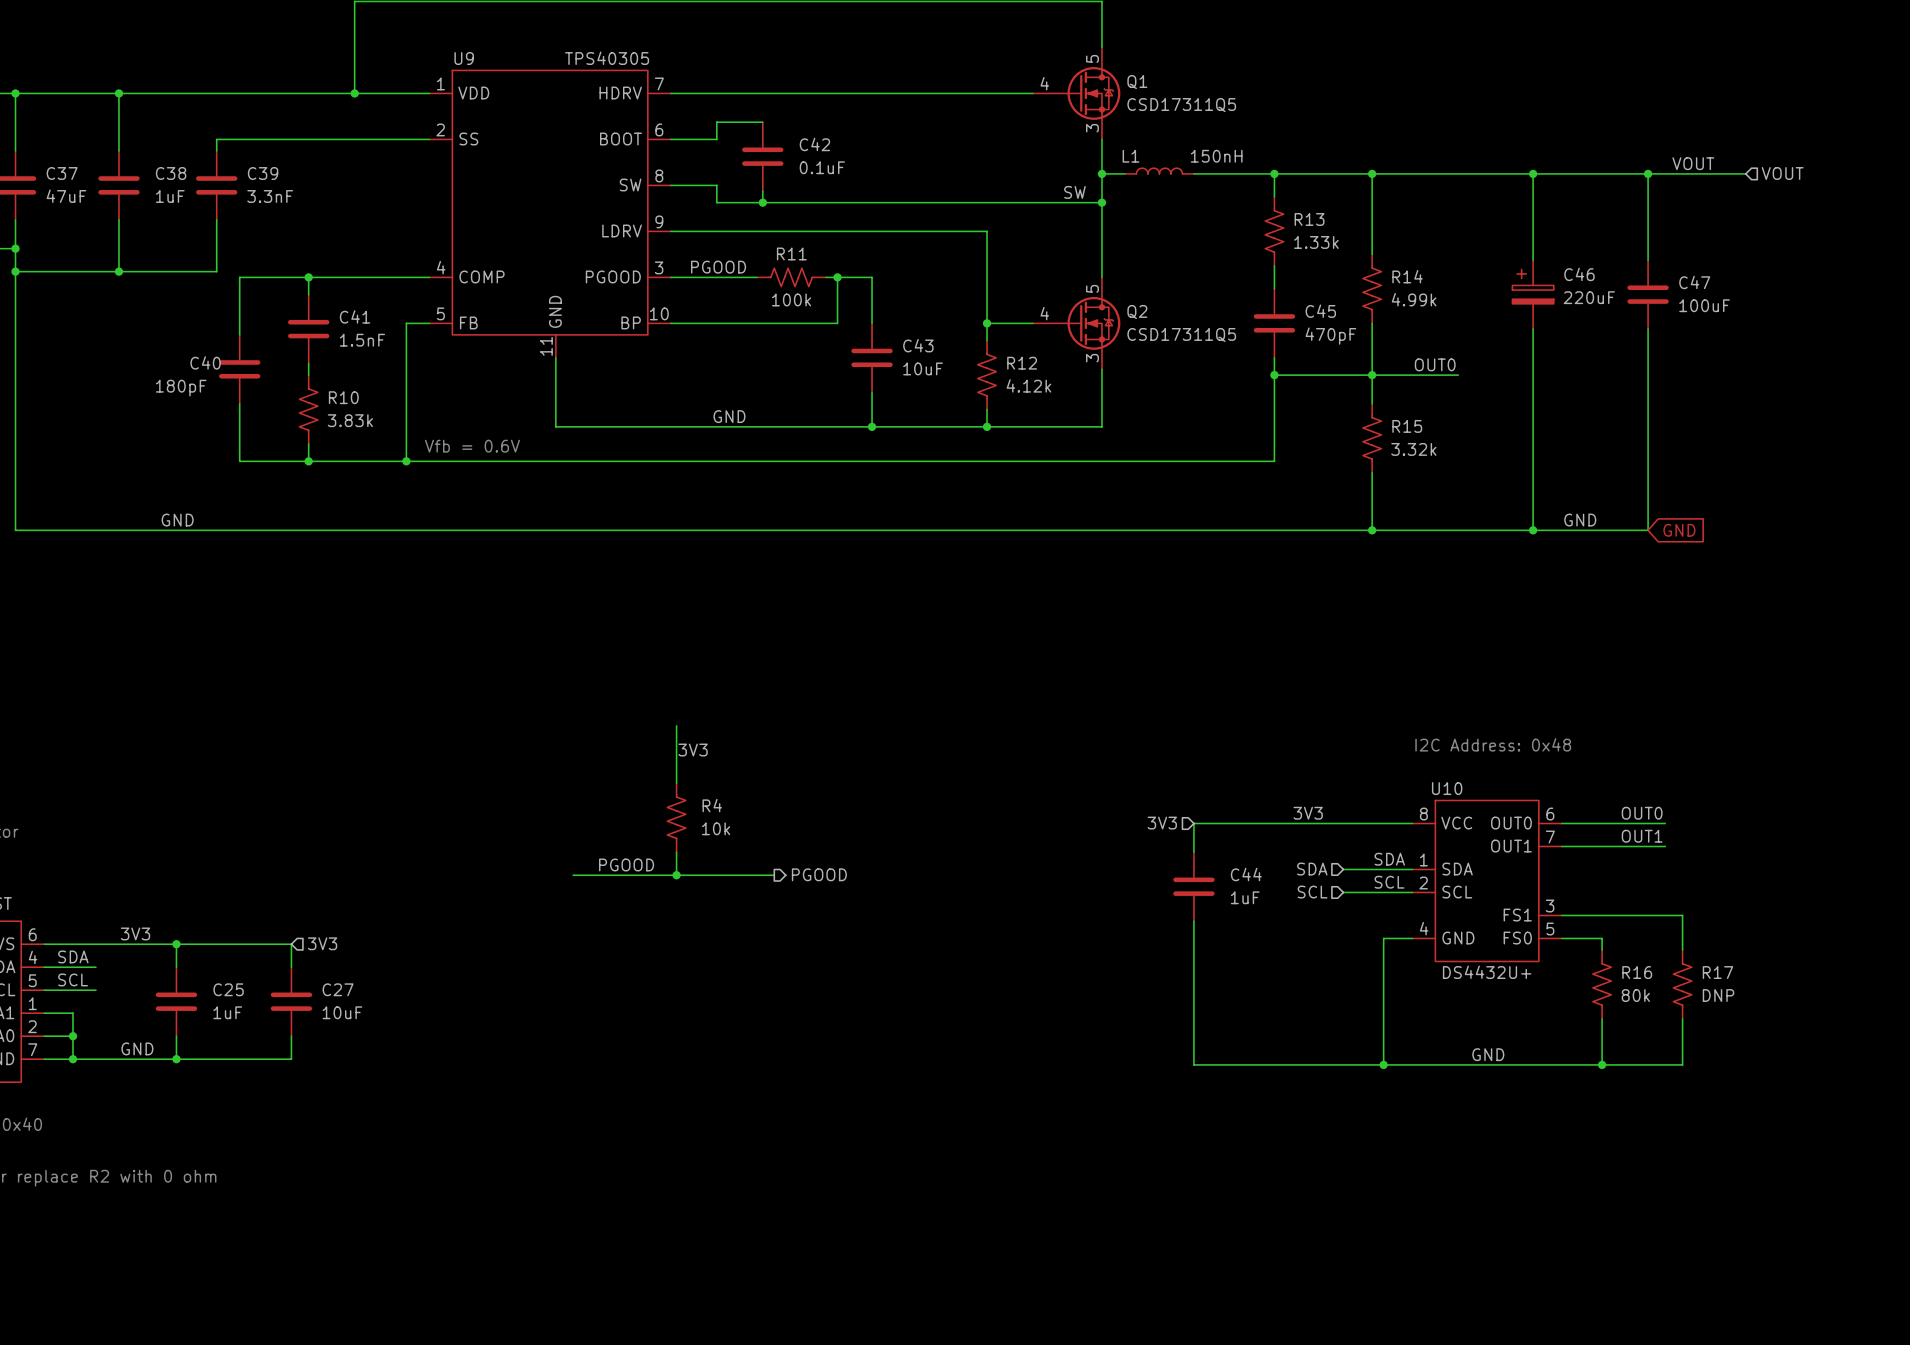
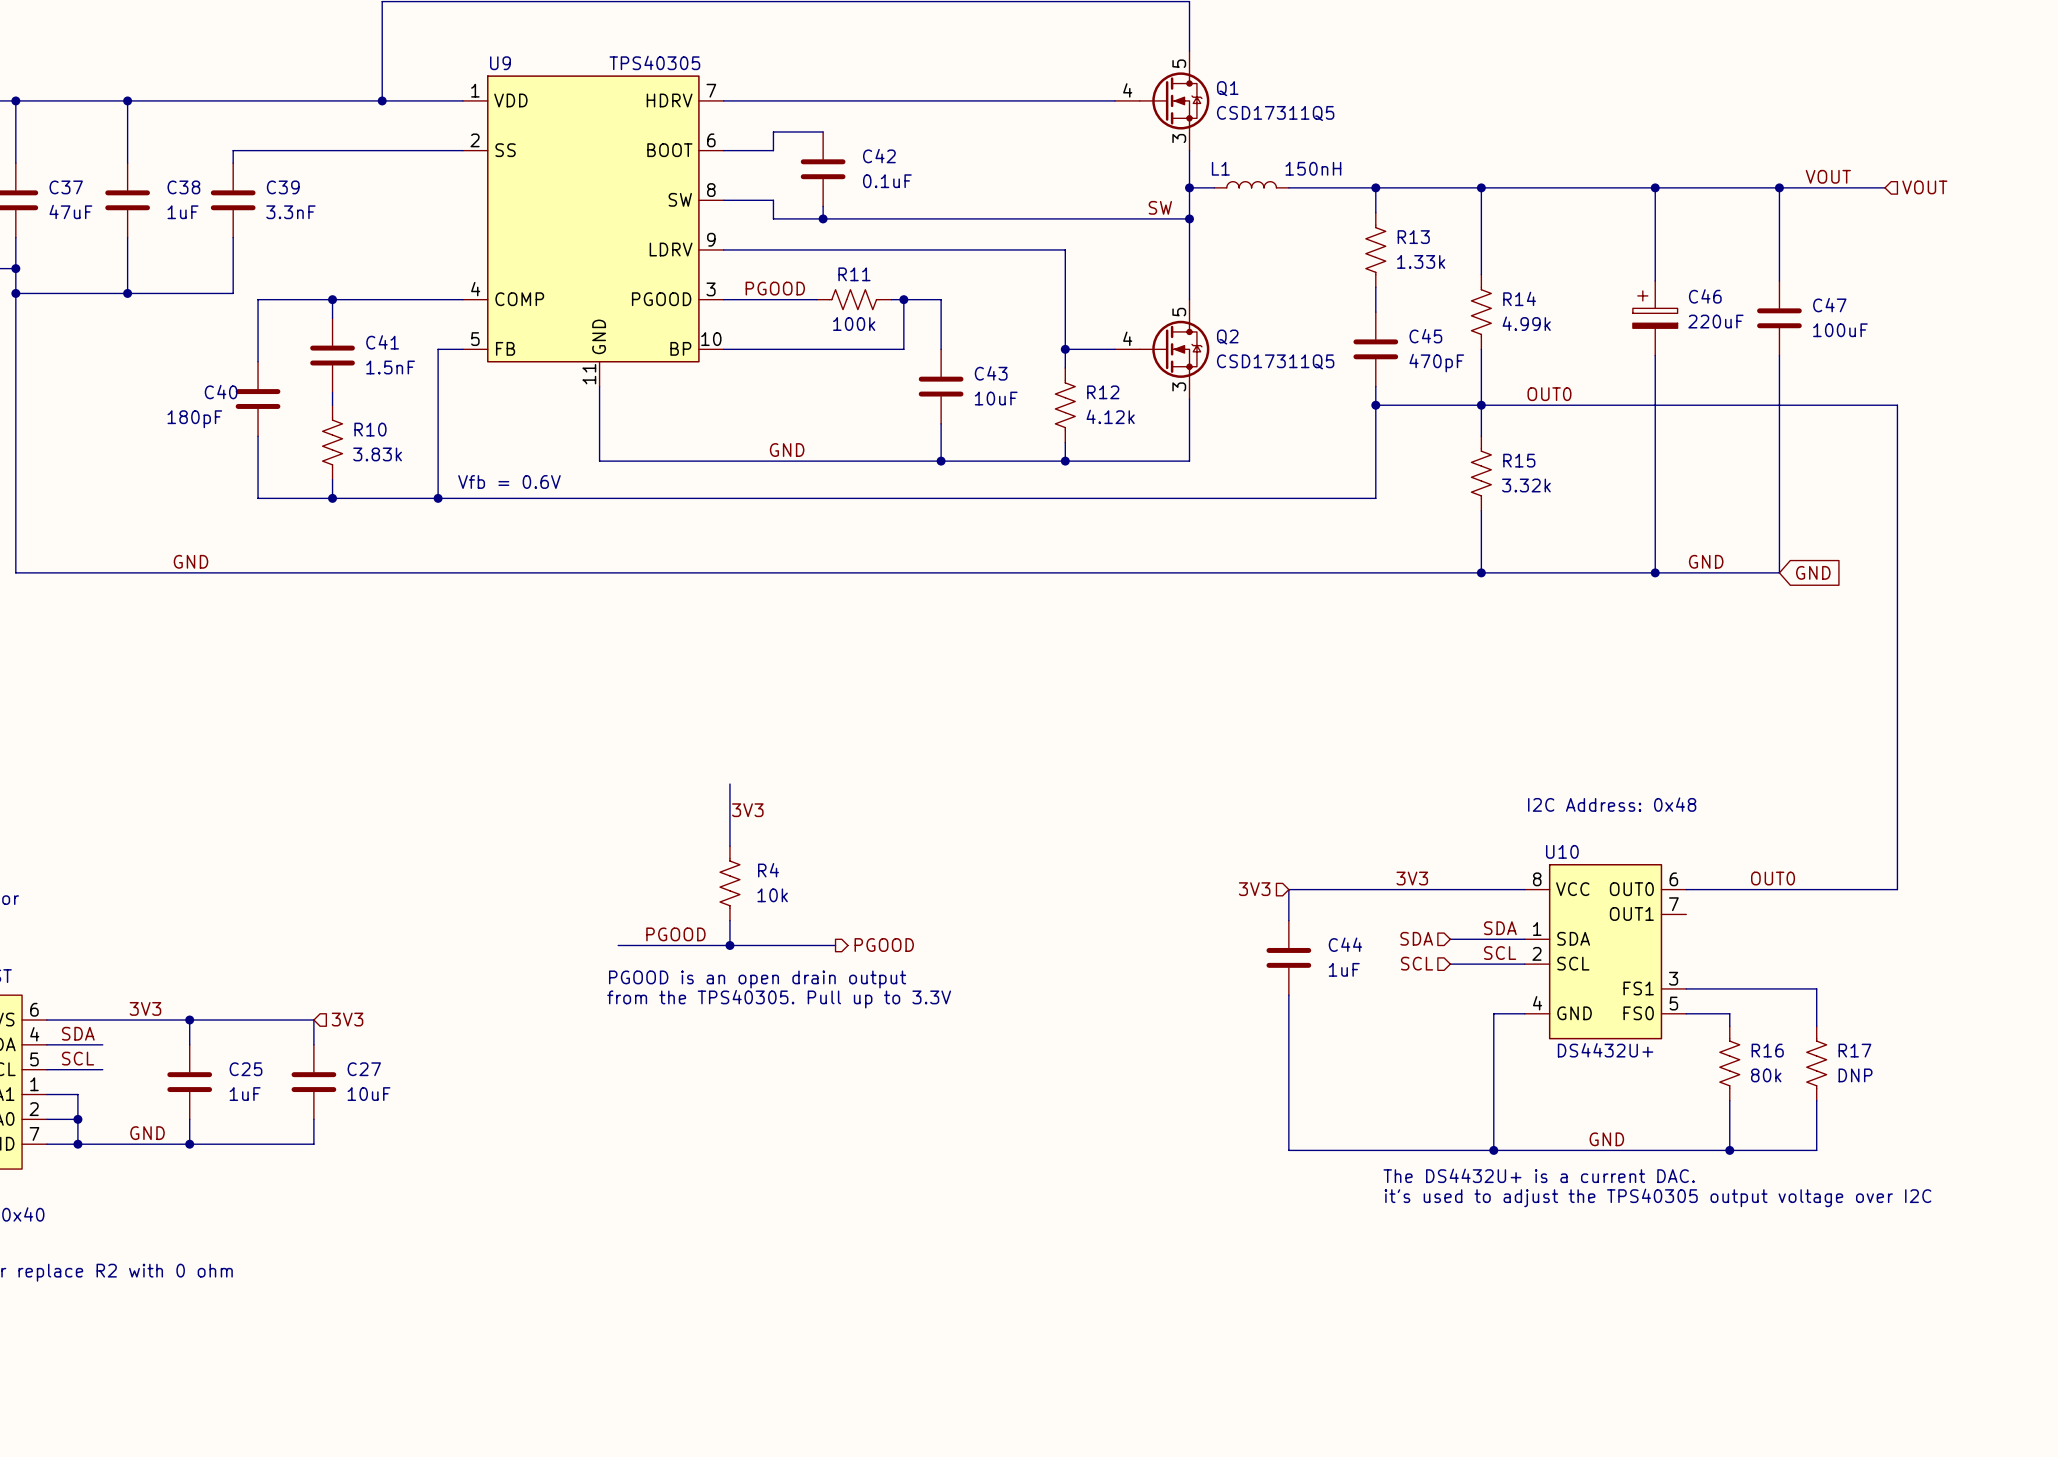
wire: none -> (1574, 405) (1897, 405) (1897, 889) (1798, 889)
label: OUT1 (1642, 836) -> none
wire: (1561, 846) (1665, 846) -> none
text: none -> PGOOD is an open drain output (757, 979)
text: none -> from the TPS40305. Pull up to 3.3V (779, 999)
text: none -> The DS4432U+ is a current DAC. (1539, 1175)
text: none -> it's used to adjust the TPS40305 output voltage over I2C (1658, 1197)

